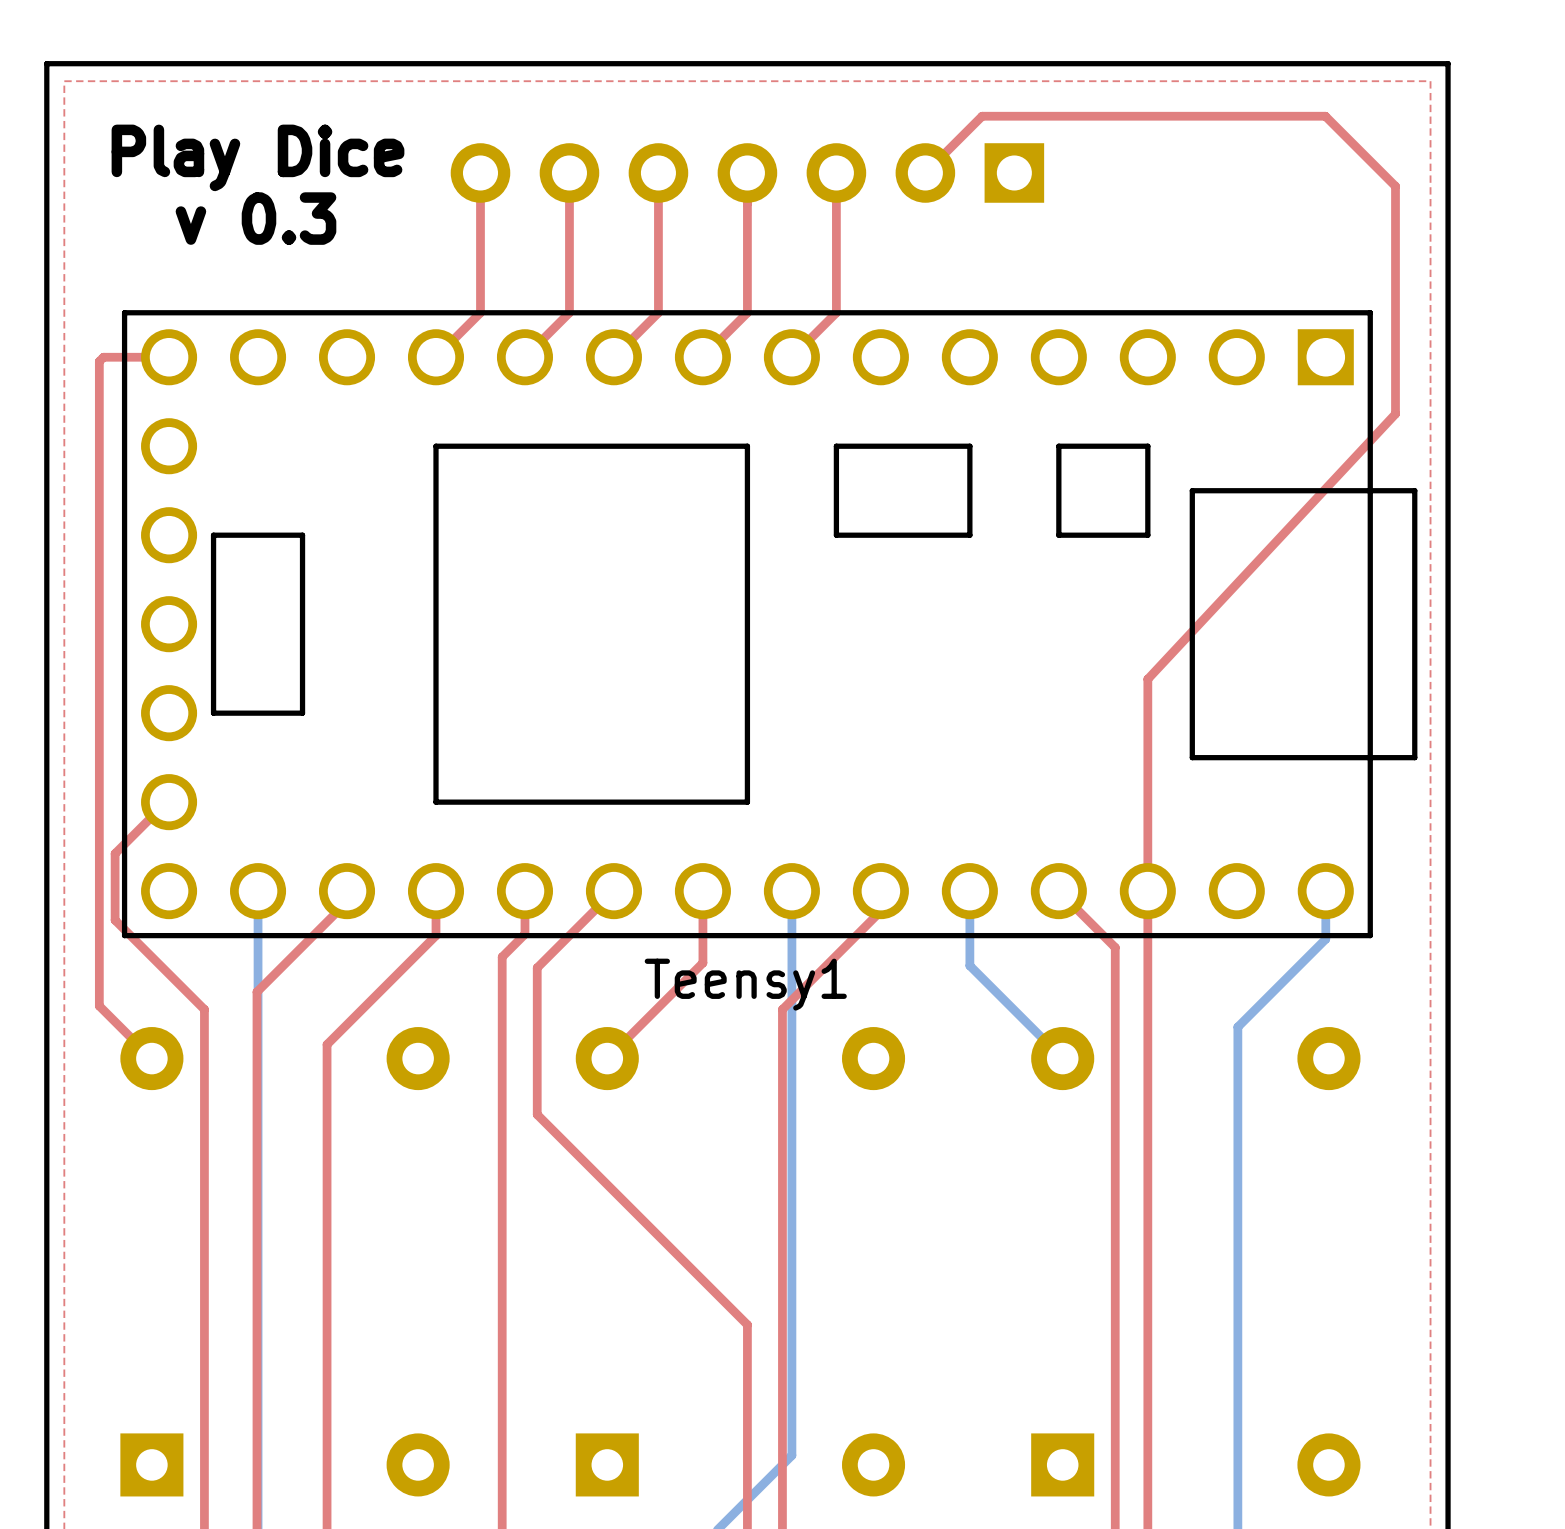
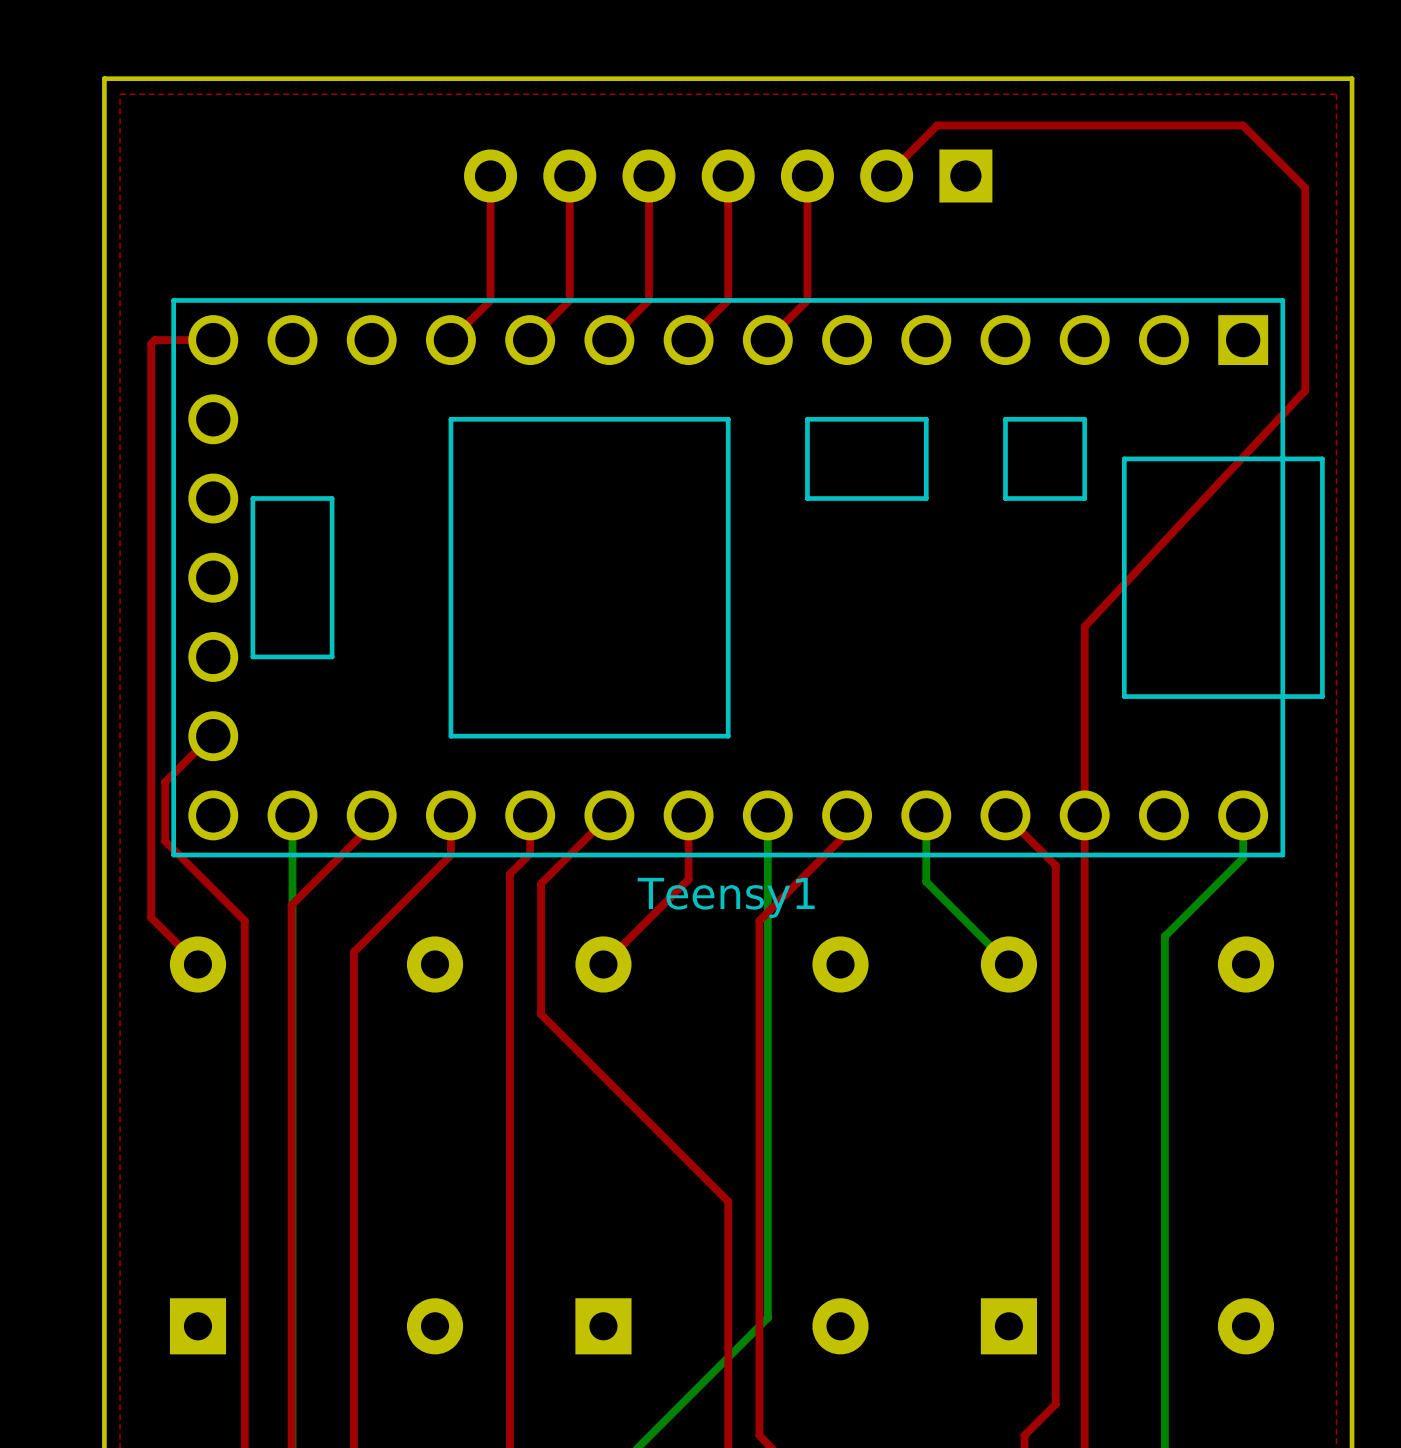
text: Play Dice (257, 157) -> none
text: v 0.3 (255, 218) -> none

